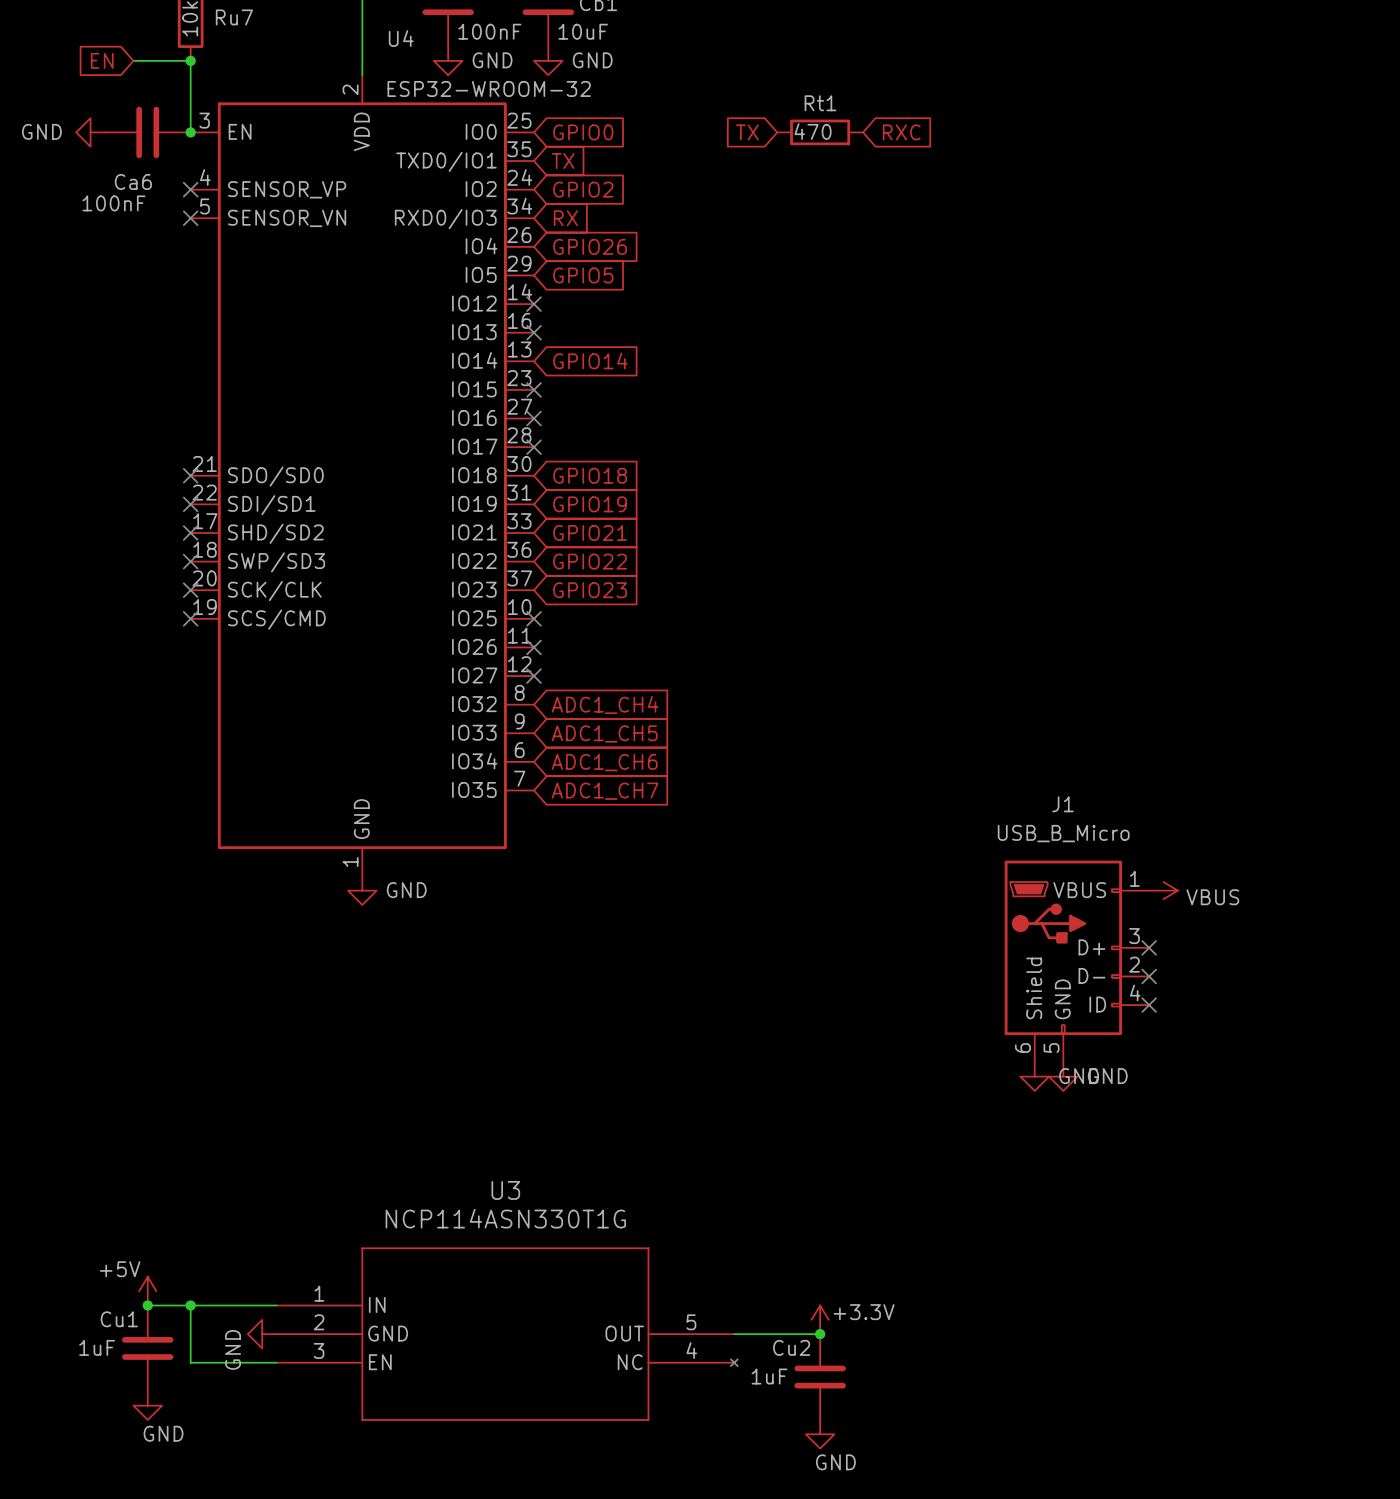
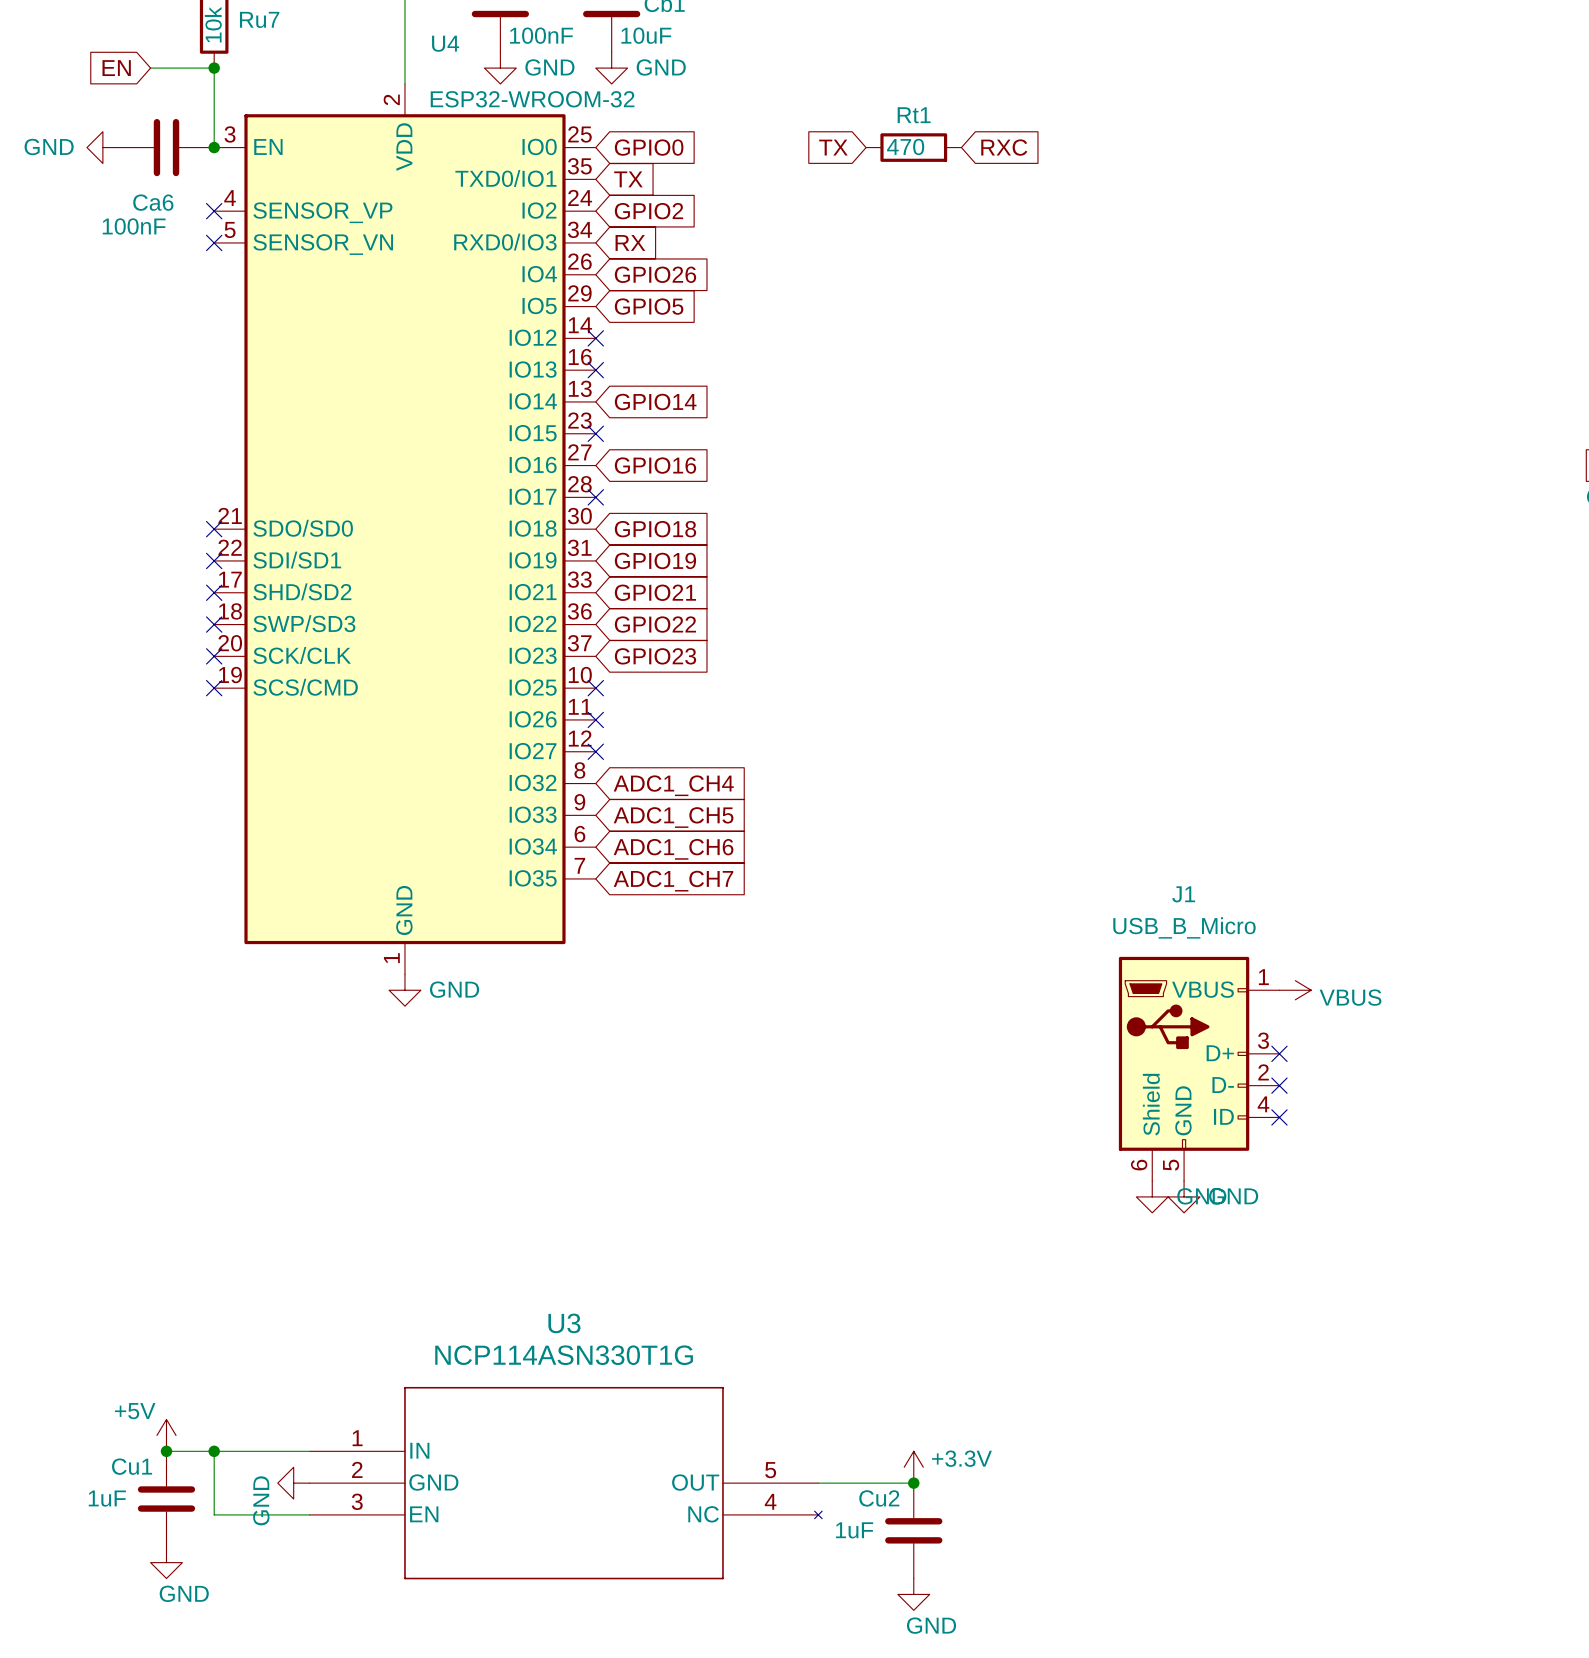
no-connect mark: (534, 418) -> none
global label: none -> GPIO16 (655, 465)

